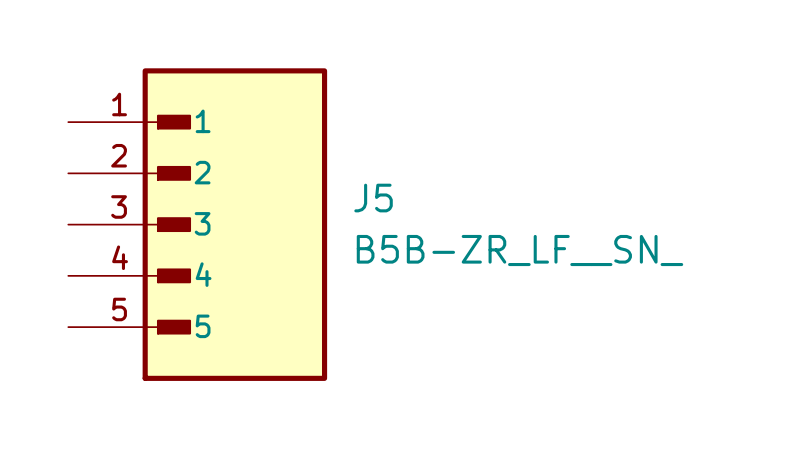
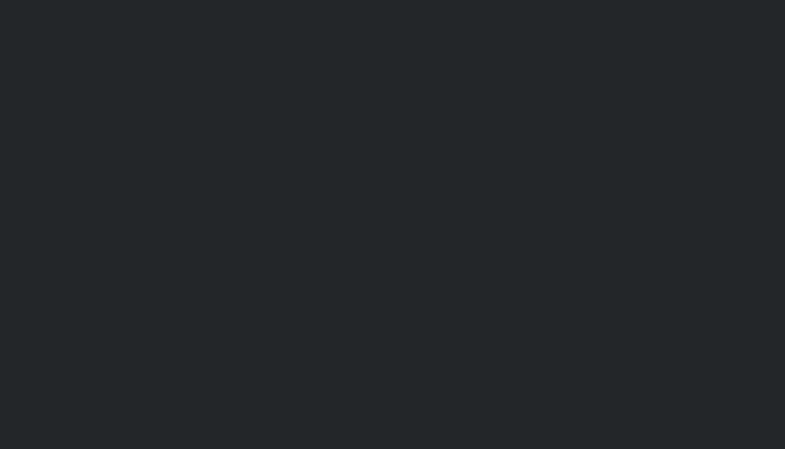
J5: B5B-ZR_LF__SN_ (197, 224) -> none

